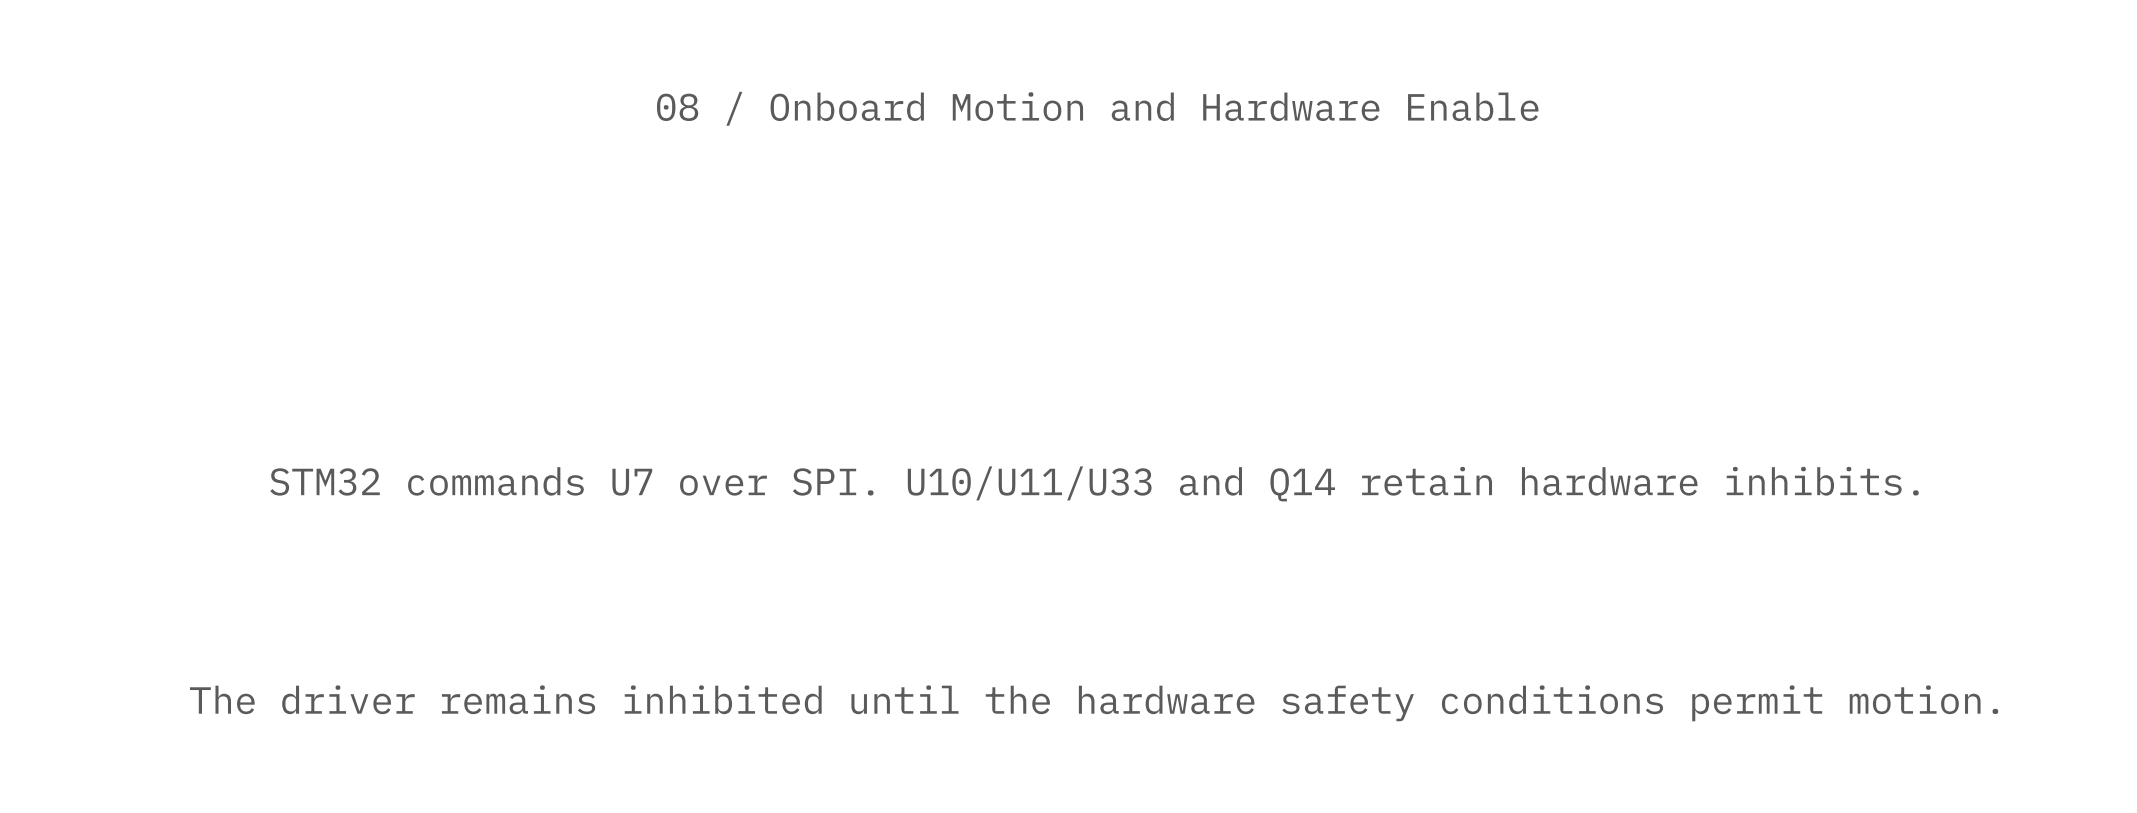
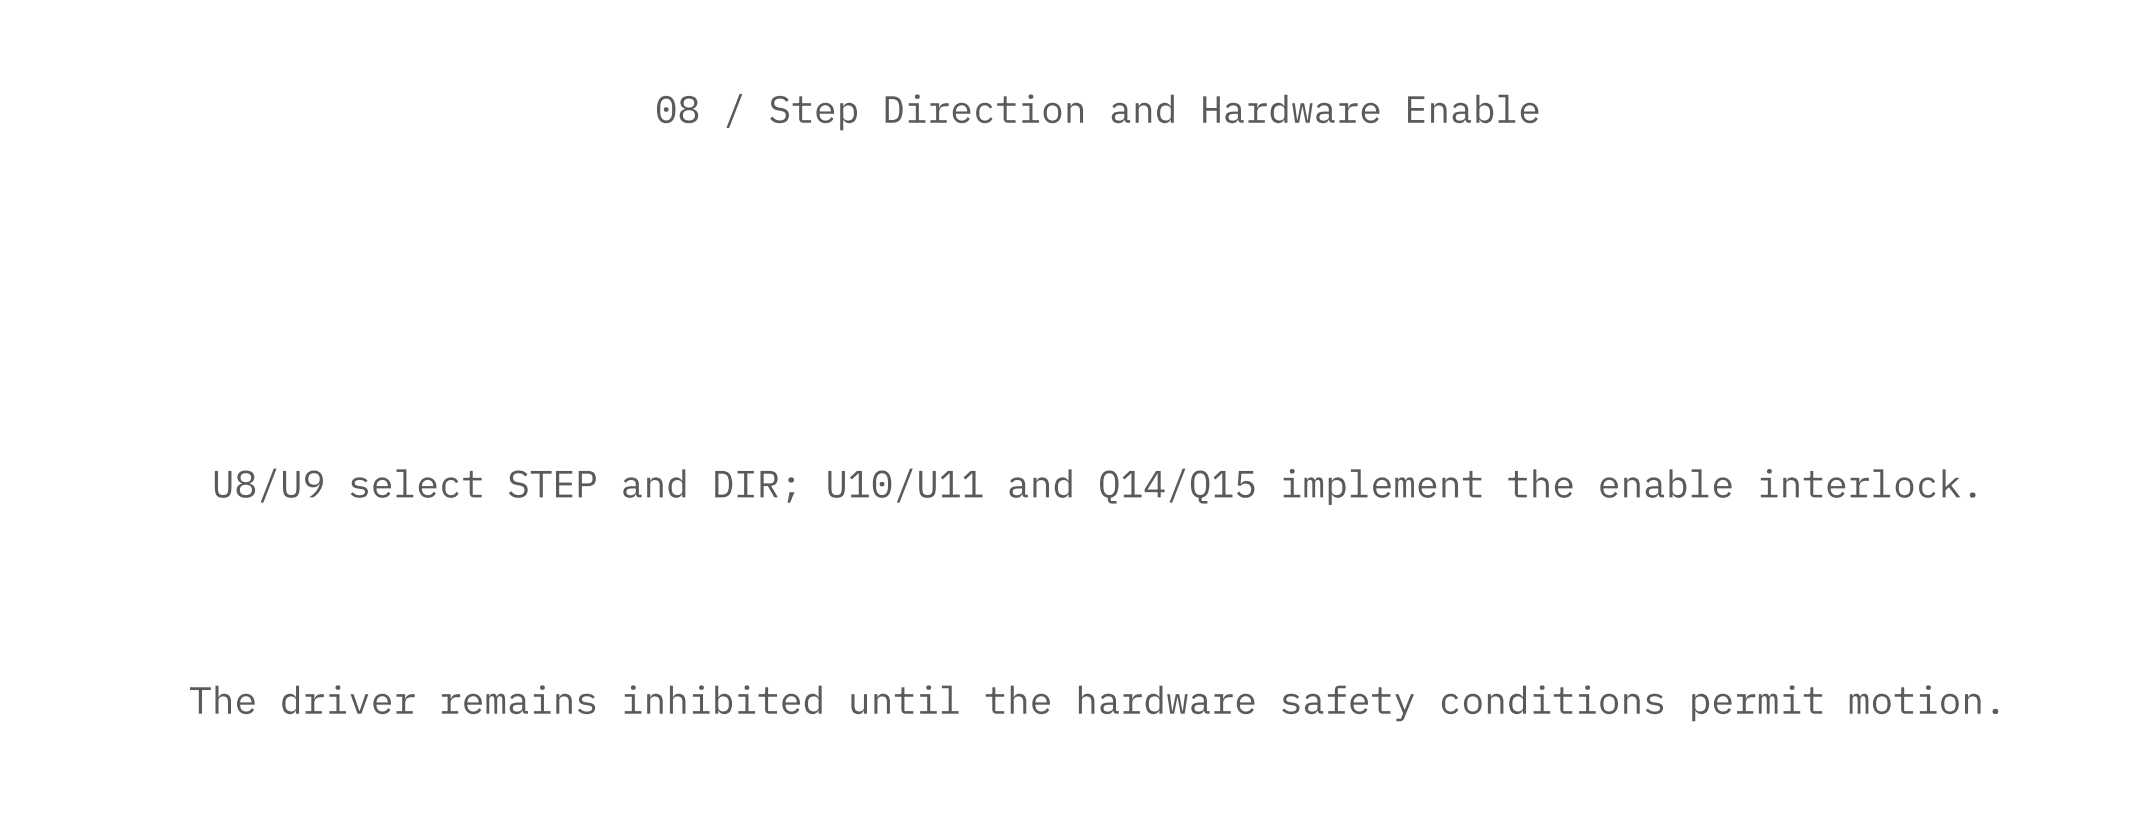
text: 08 / Onboard Motion and Hardware Enable (1097, 108) -> 08 / Step Direction and Hardware Enable (1097, 112)
text: STM32 commands U7 over SPI. U10/U11/U33 and Q14 retain hardware inhibits. (1094, 483) -> U8/U9 select STEP and DIR; U10/U11 and Q14/Q15 implement the enable interlock. (1095, 486)

